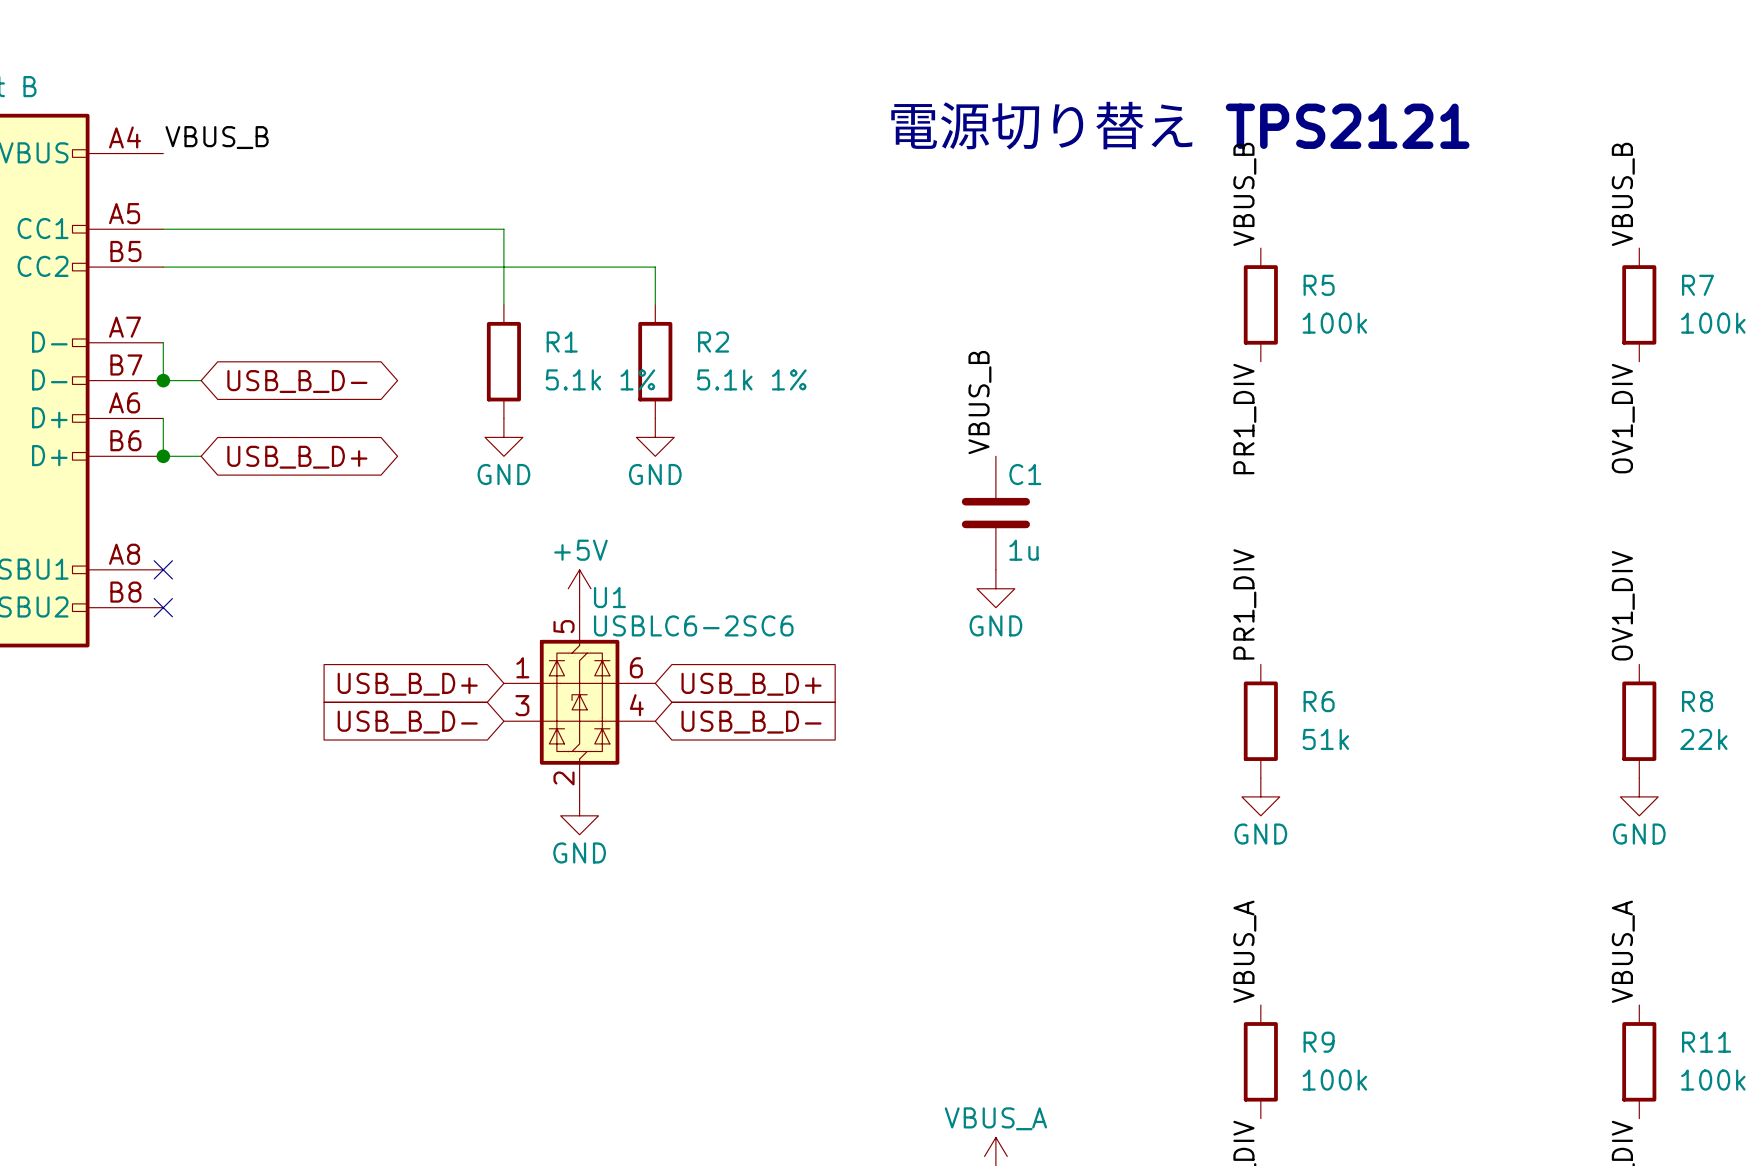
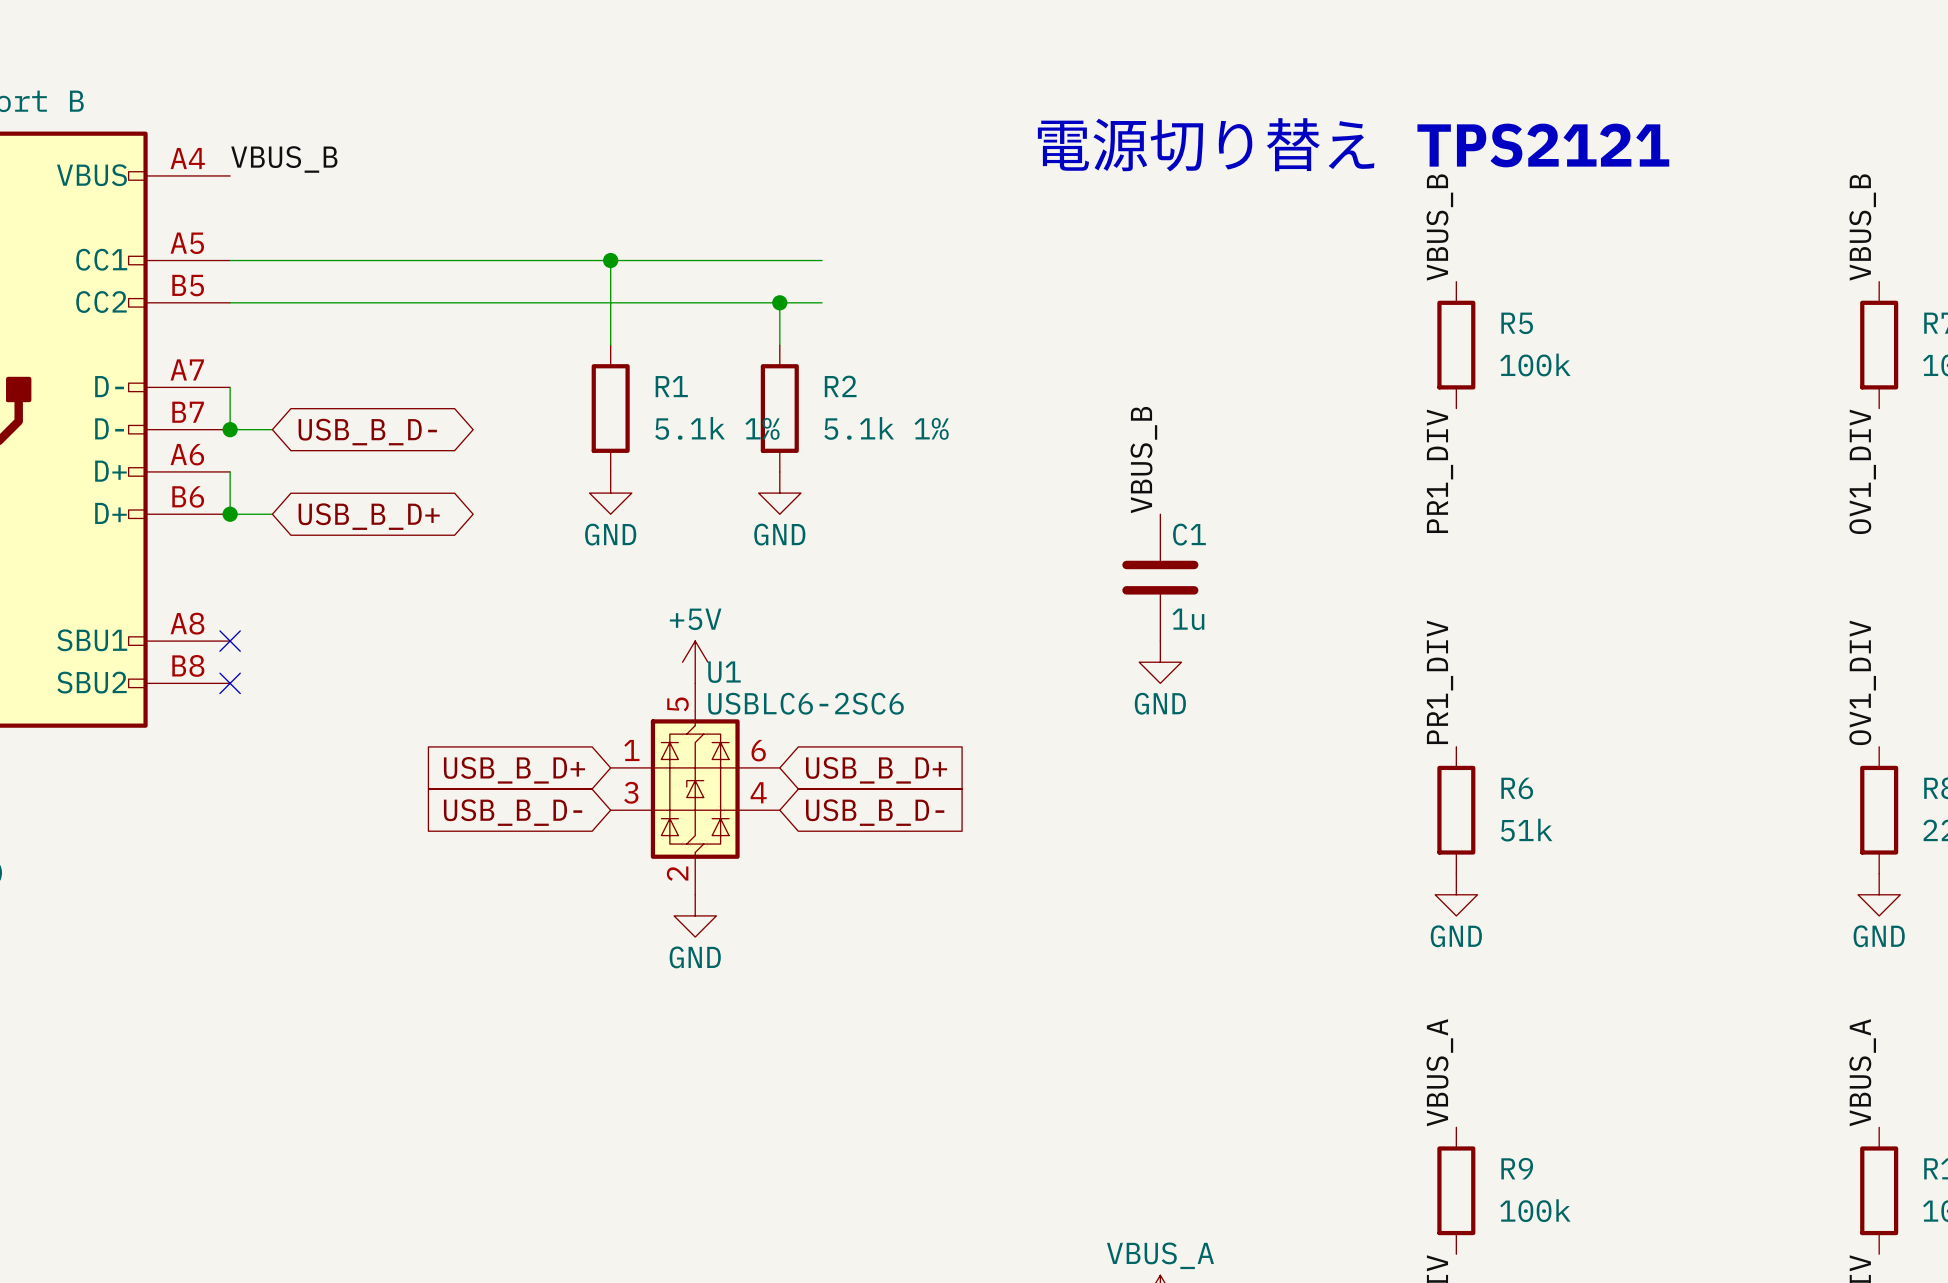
wire: none -> (610, 260) (822, 260)
junction: none -> (610, 260)
wire: none -> (779, 302) (822, 302)
junction: none -> (779, 302)

